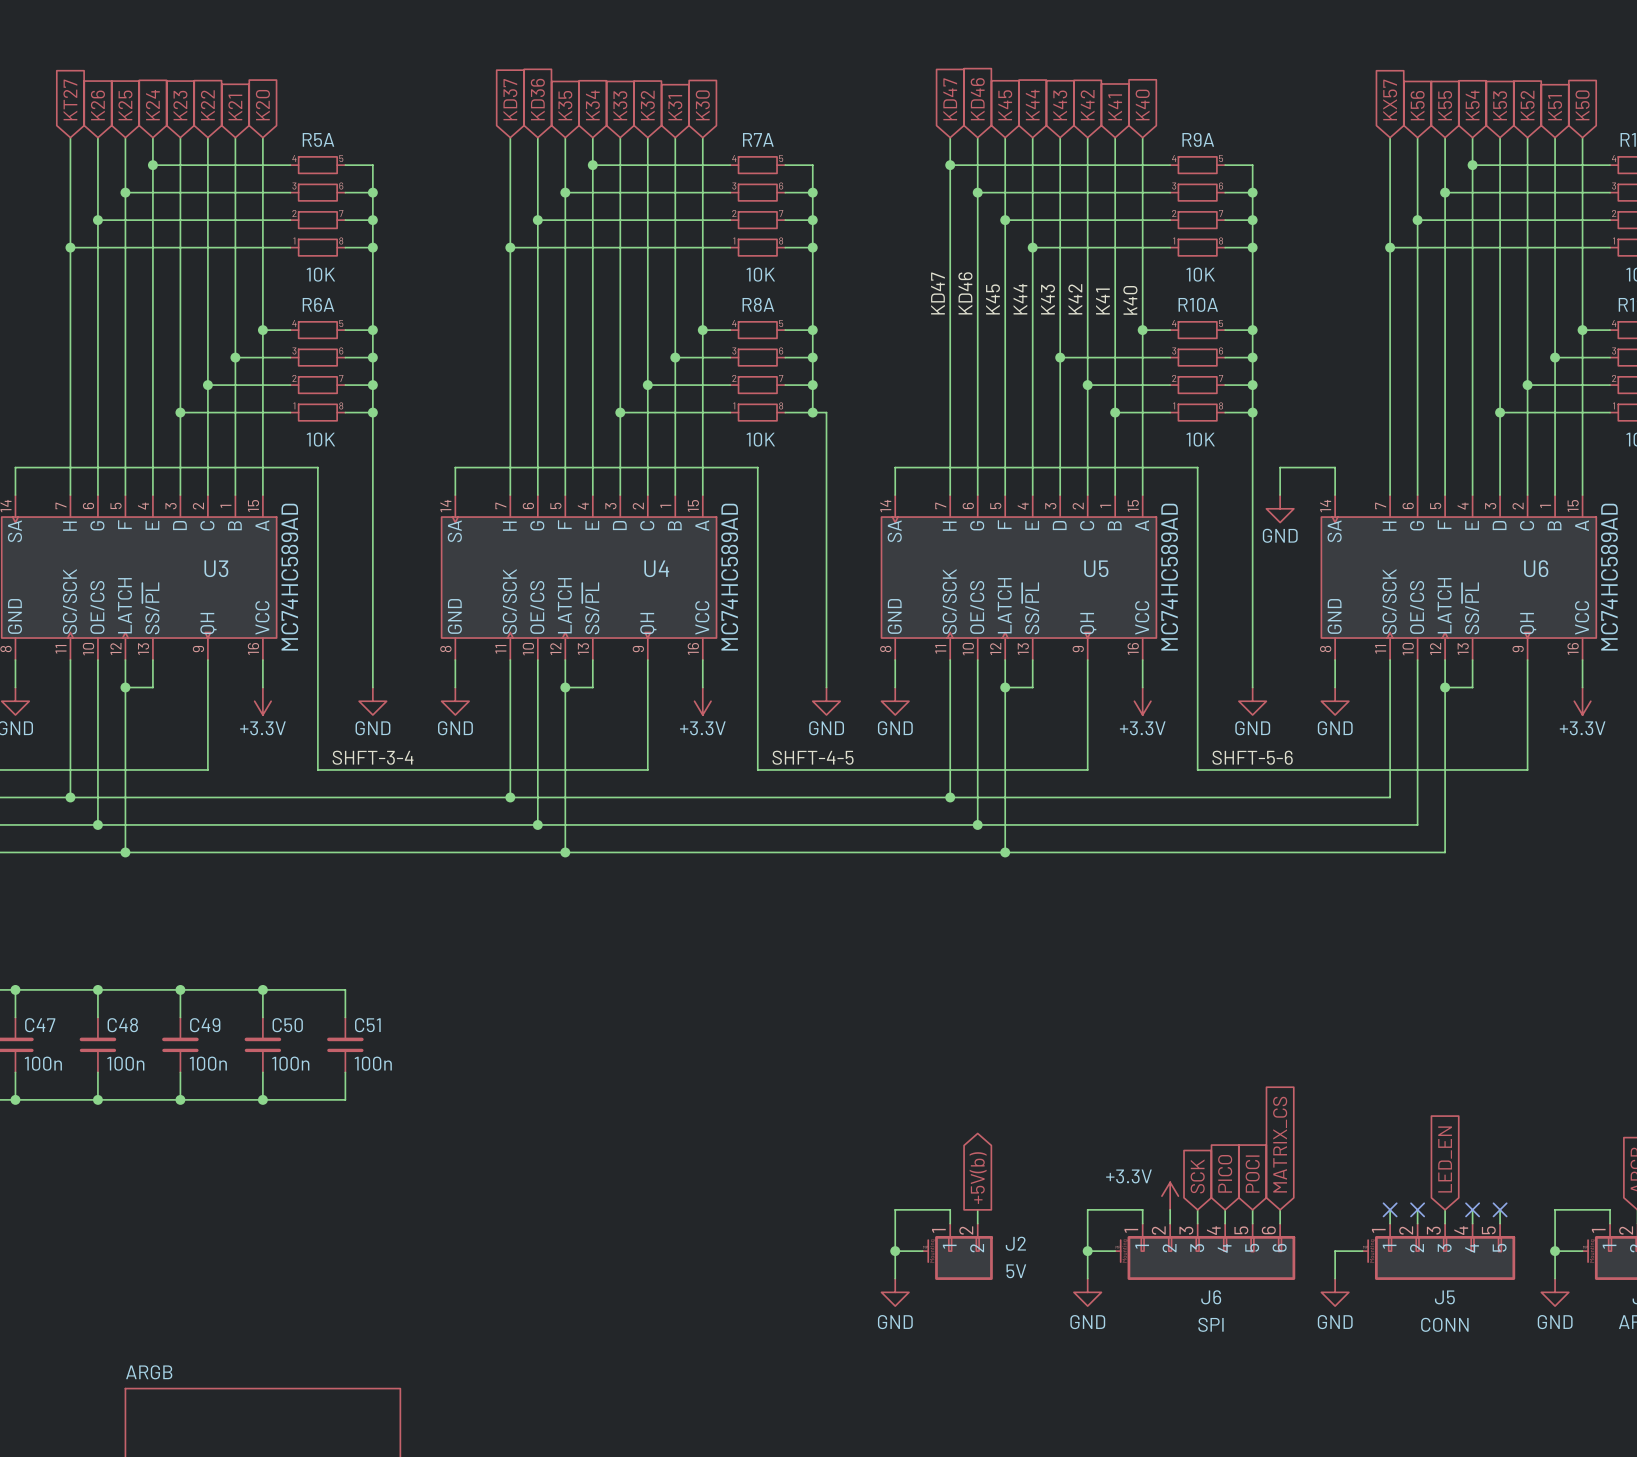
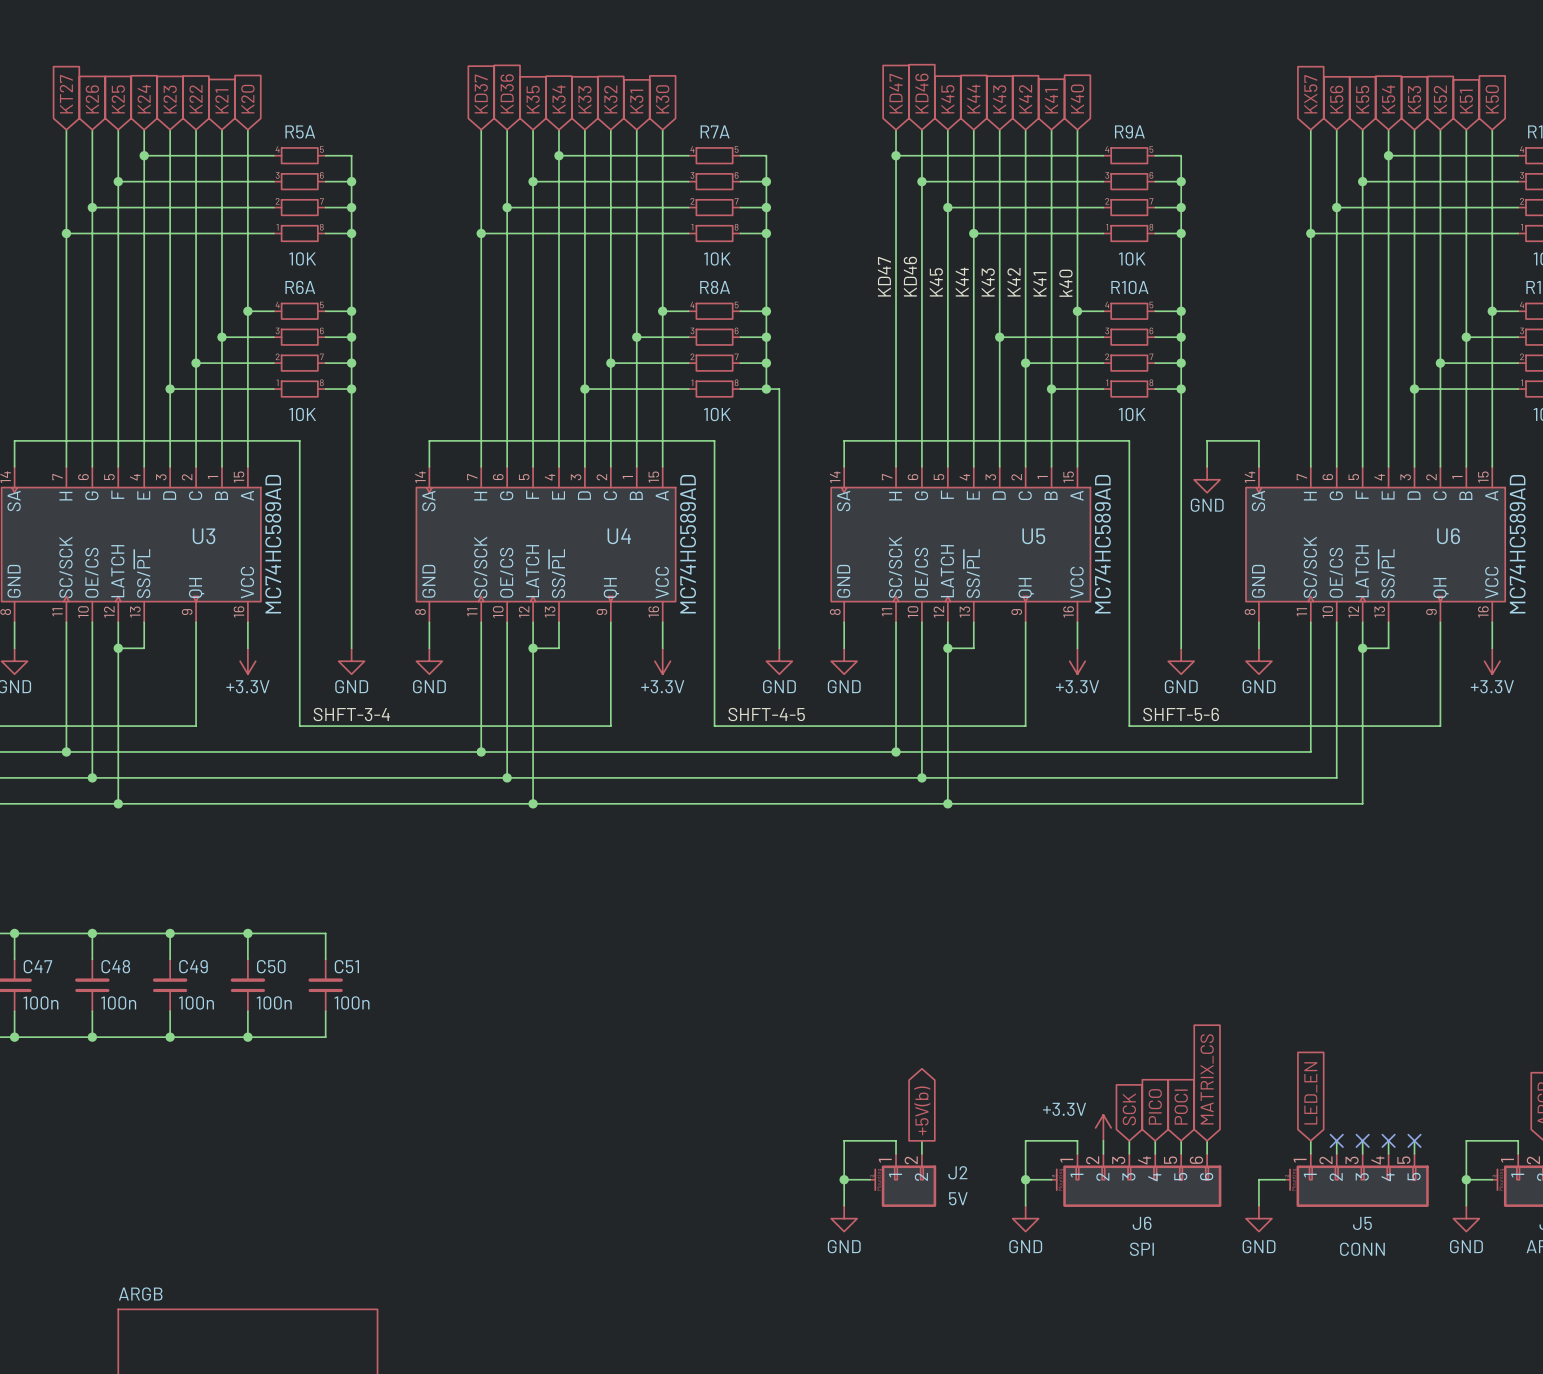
global label position: LED_EN (1445, 1159) -> LED_EN (1310, 1093)
no-connect mark position: (1390, 1209) -> (1362, 1140)

